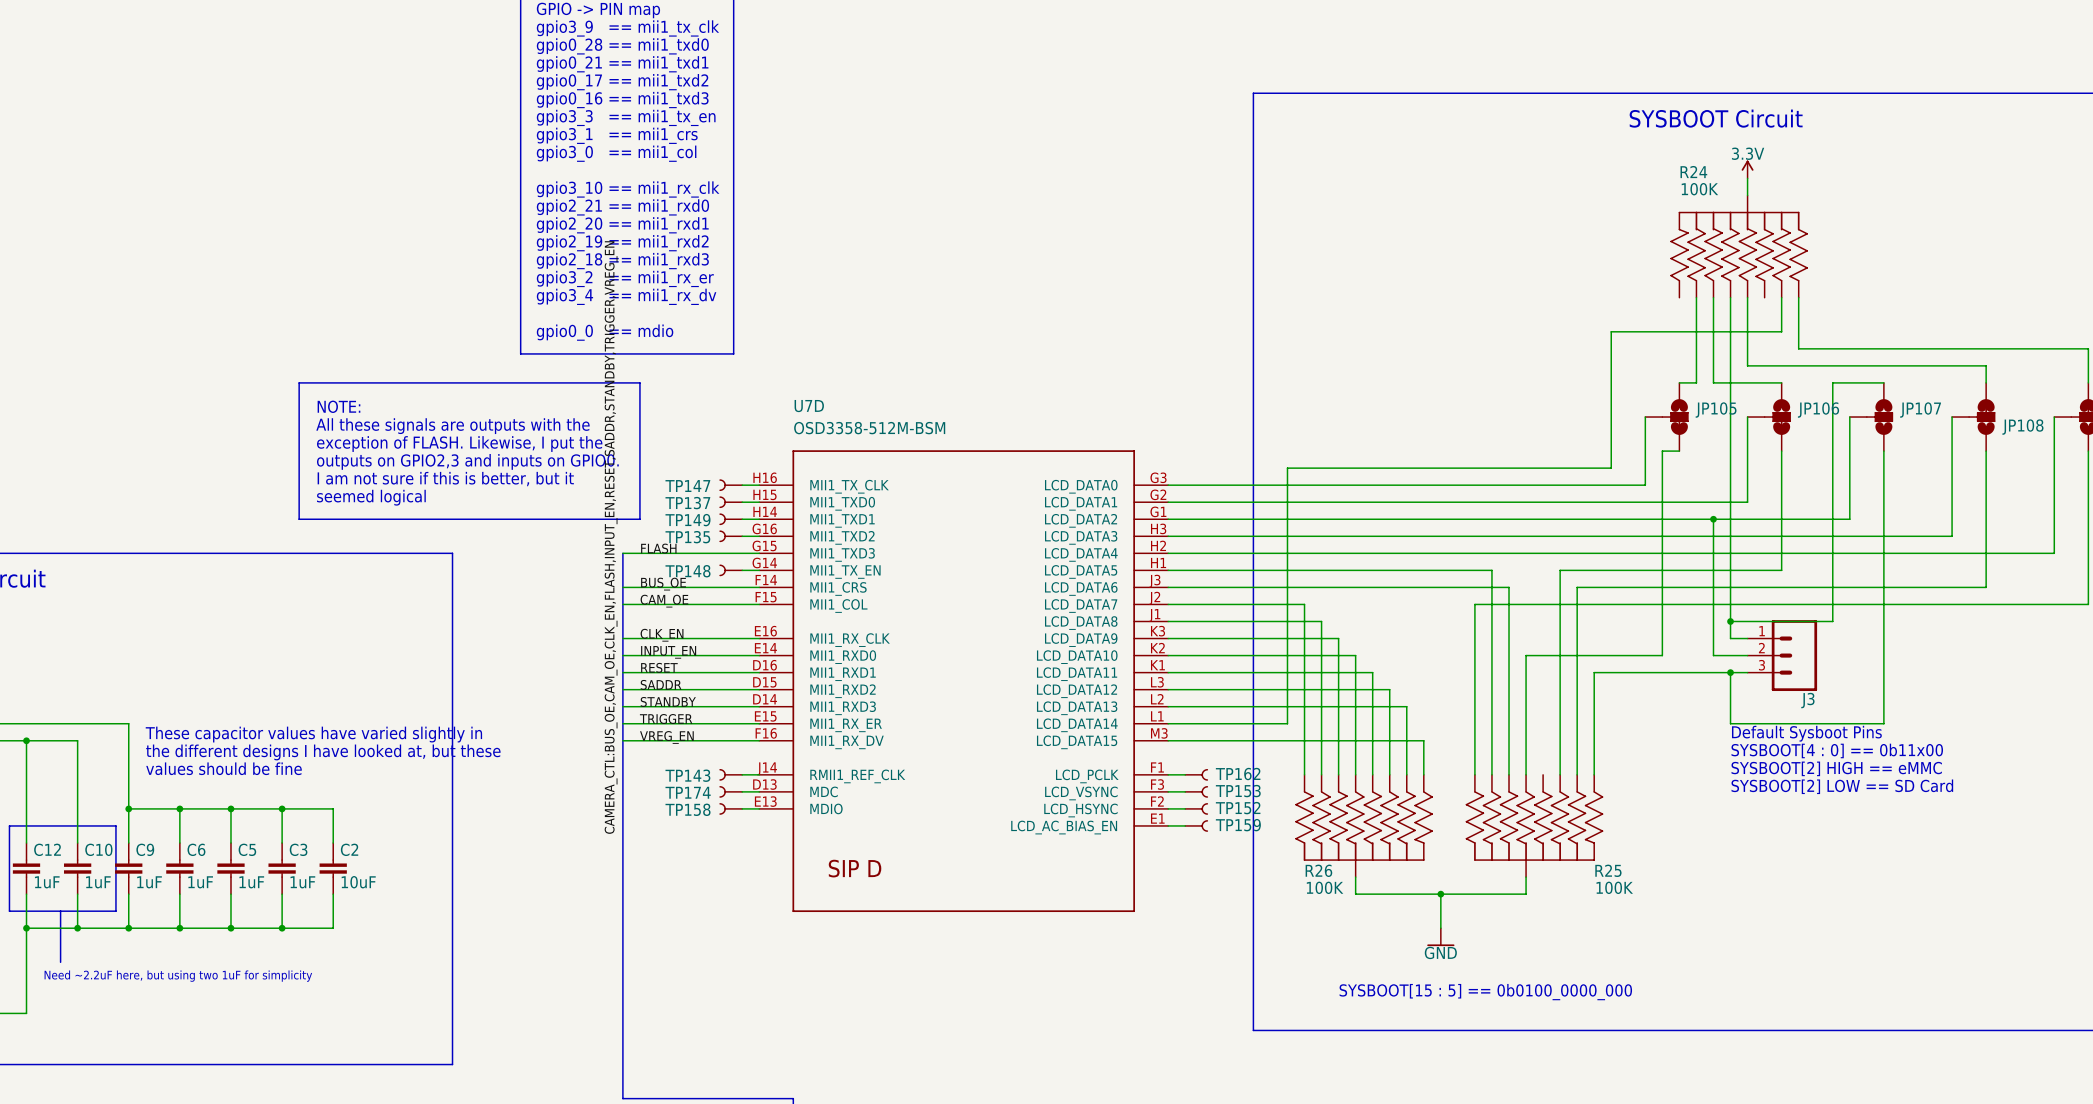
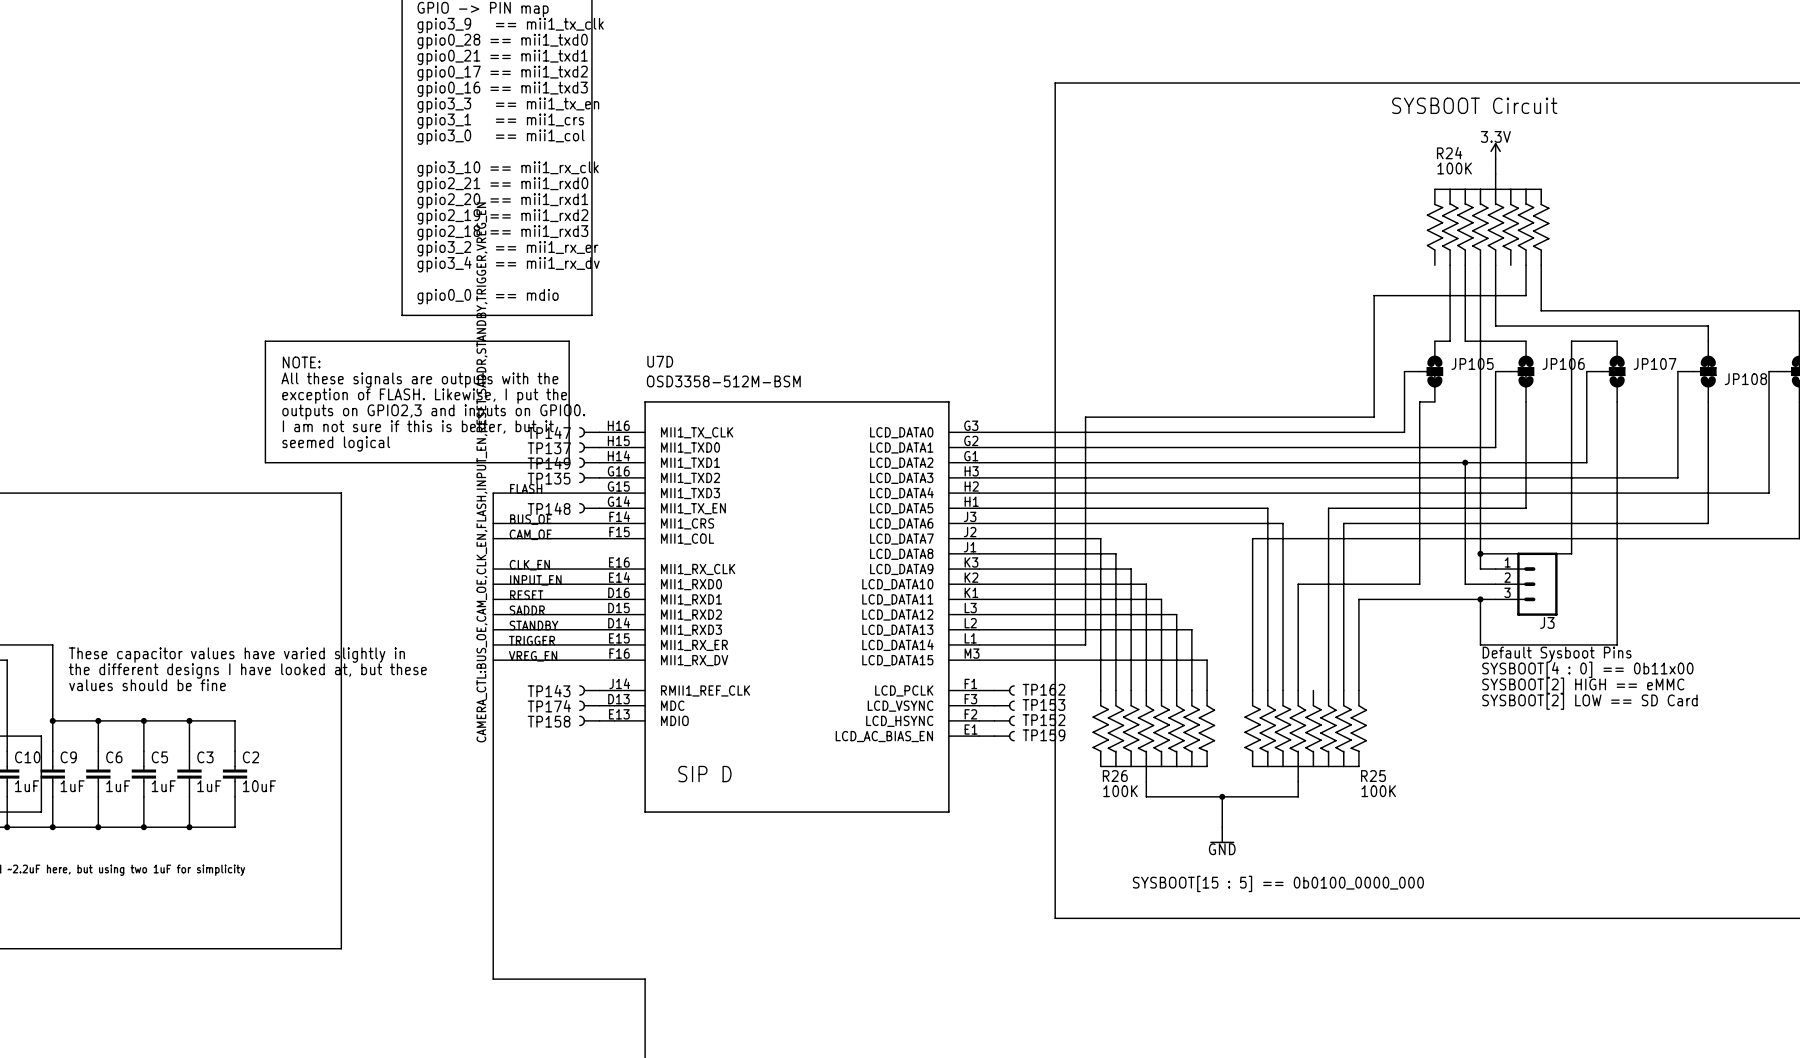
line: (367, 382) (299, 382) (299, 519) (367, 519) -> (265, 341) (265, 462)
line: (639, 382) (639, 519) -> (508, 341) (569, 341) (569, 462) (508, 462)
text position: NOTE: (338, 406) -> NOTE: (301, 362)
text position: All these signals are outputs with the (452, 426) -> All these signals are outputs with the (419, 380)
text position: exception of FLASH. Likewise, I put the (459, 444) -> exception of FLASH. Likewise, I put the (424, 396)
text position: outputs on GPIO2,3 and inputs on GPIO0. (467, 461) -> outputs on GPIO2,3 and inputs on GPIO0. (433, 412)
text position: I am not sure if this is better, but it (445, 479) -> I am not sure if this is better, but it (418, 427)
text position: seemed logical (371, 497) -> seemed logical (336, 443)

